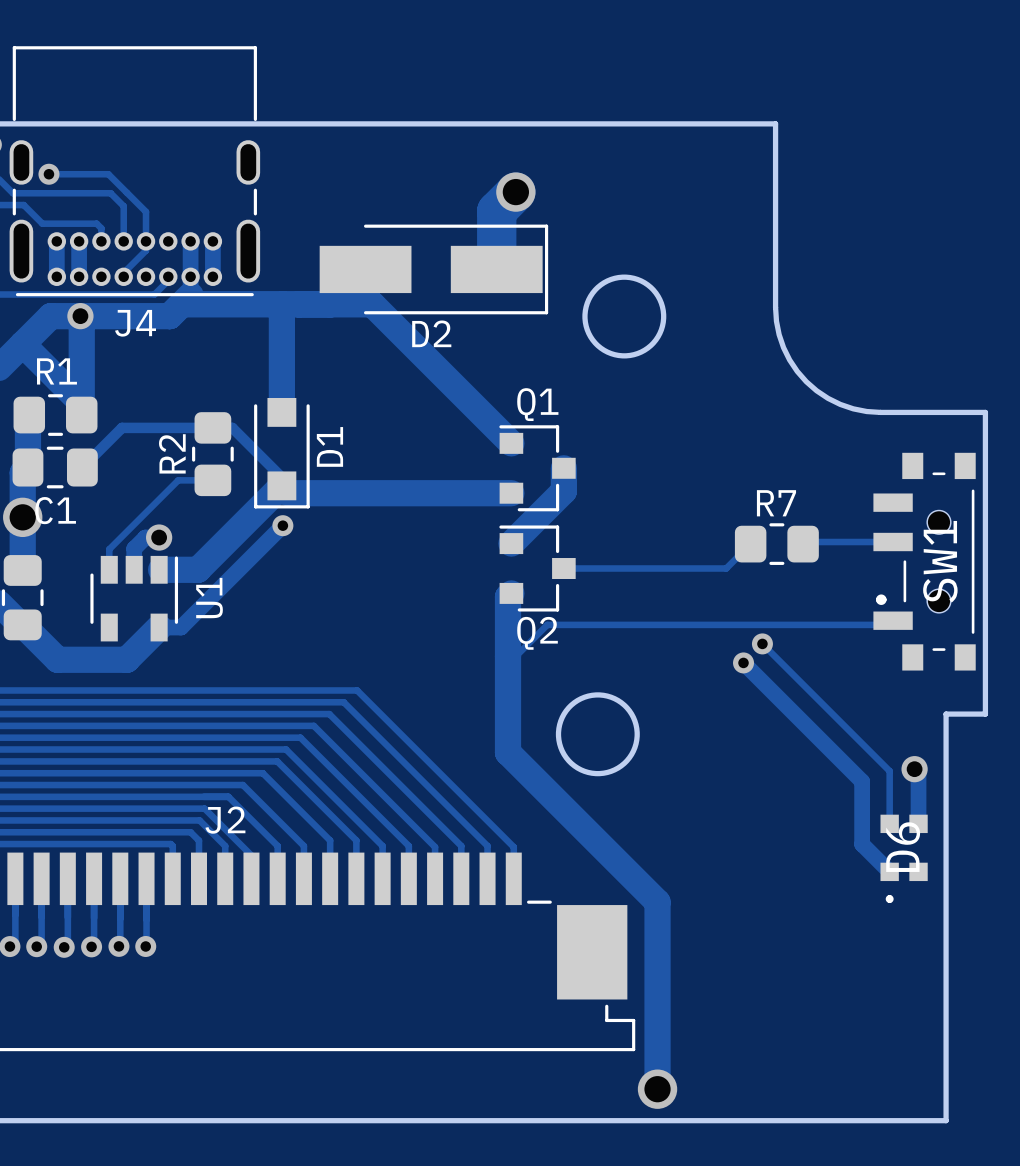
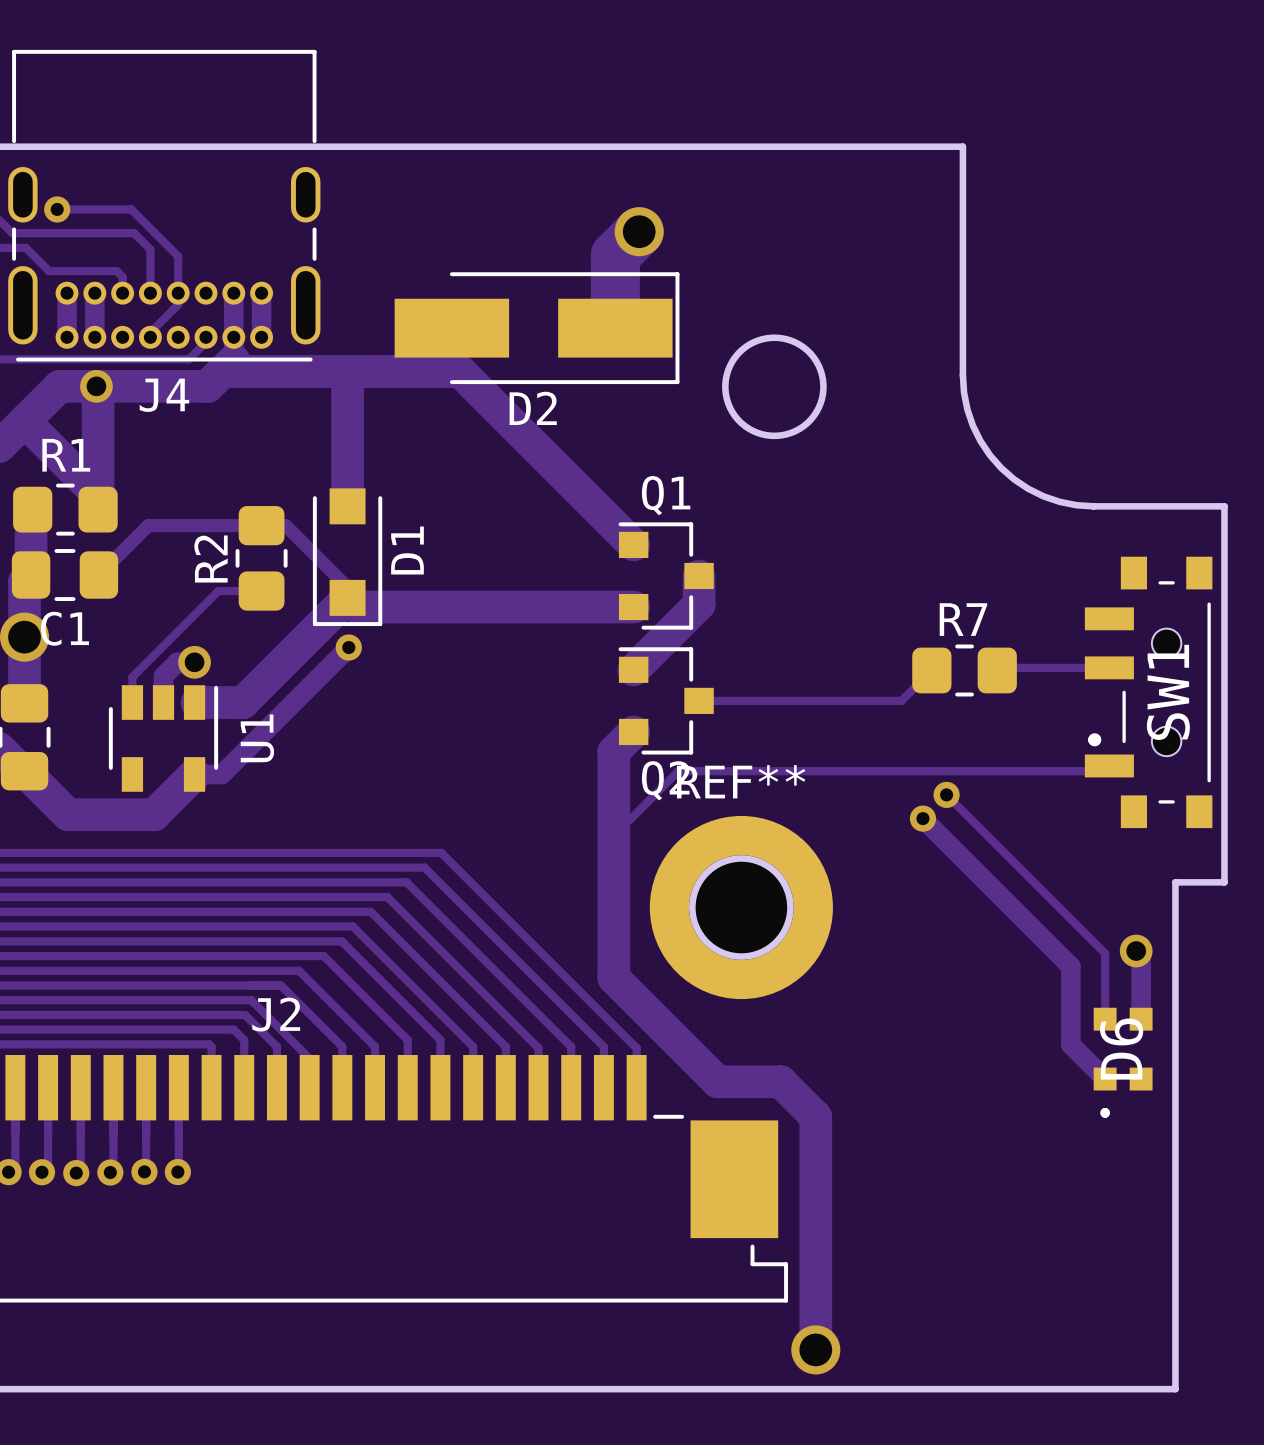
track: (508, 596) (508, 752) (629, 874) -> (629, 736) (613, 751) (613, 977) (717, 1081) (780, 1081)
REF**: none -> (741, 907)

